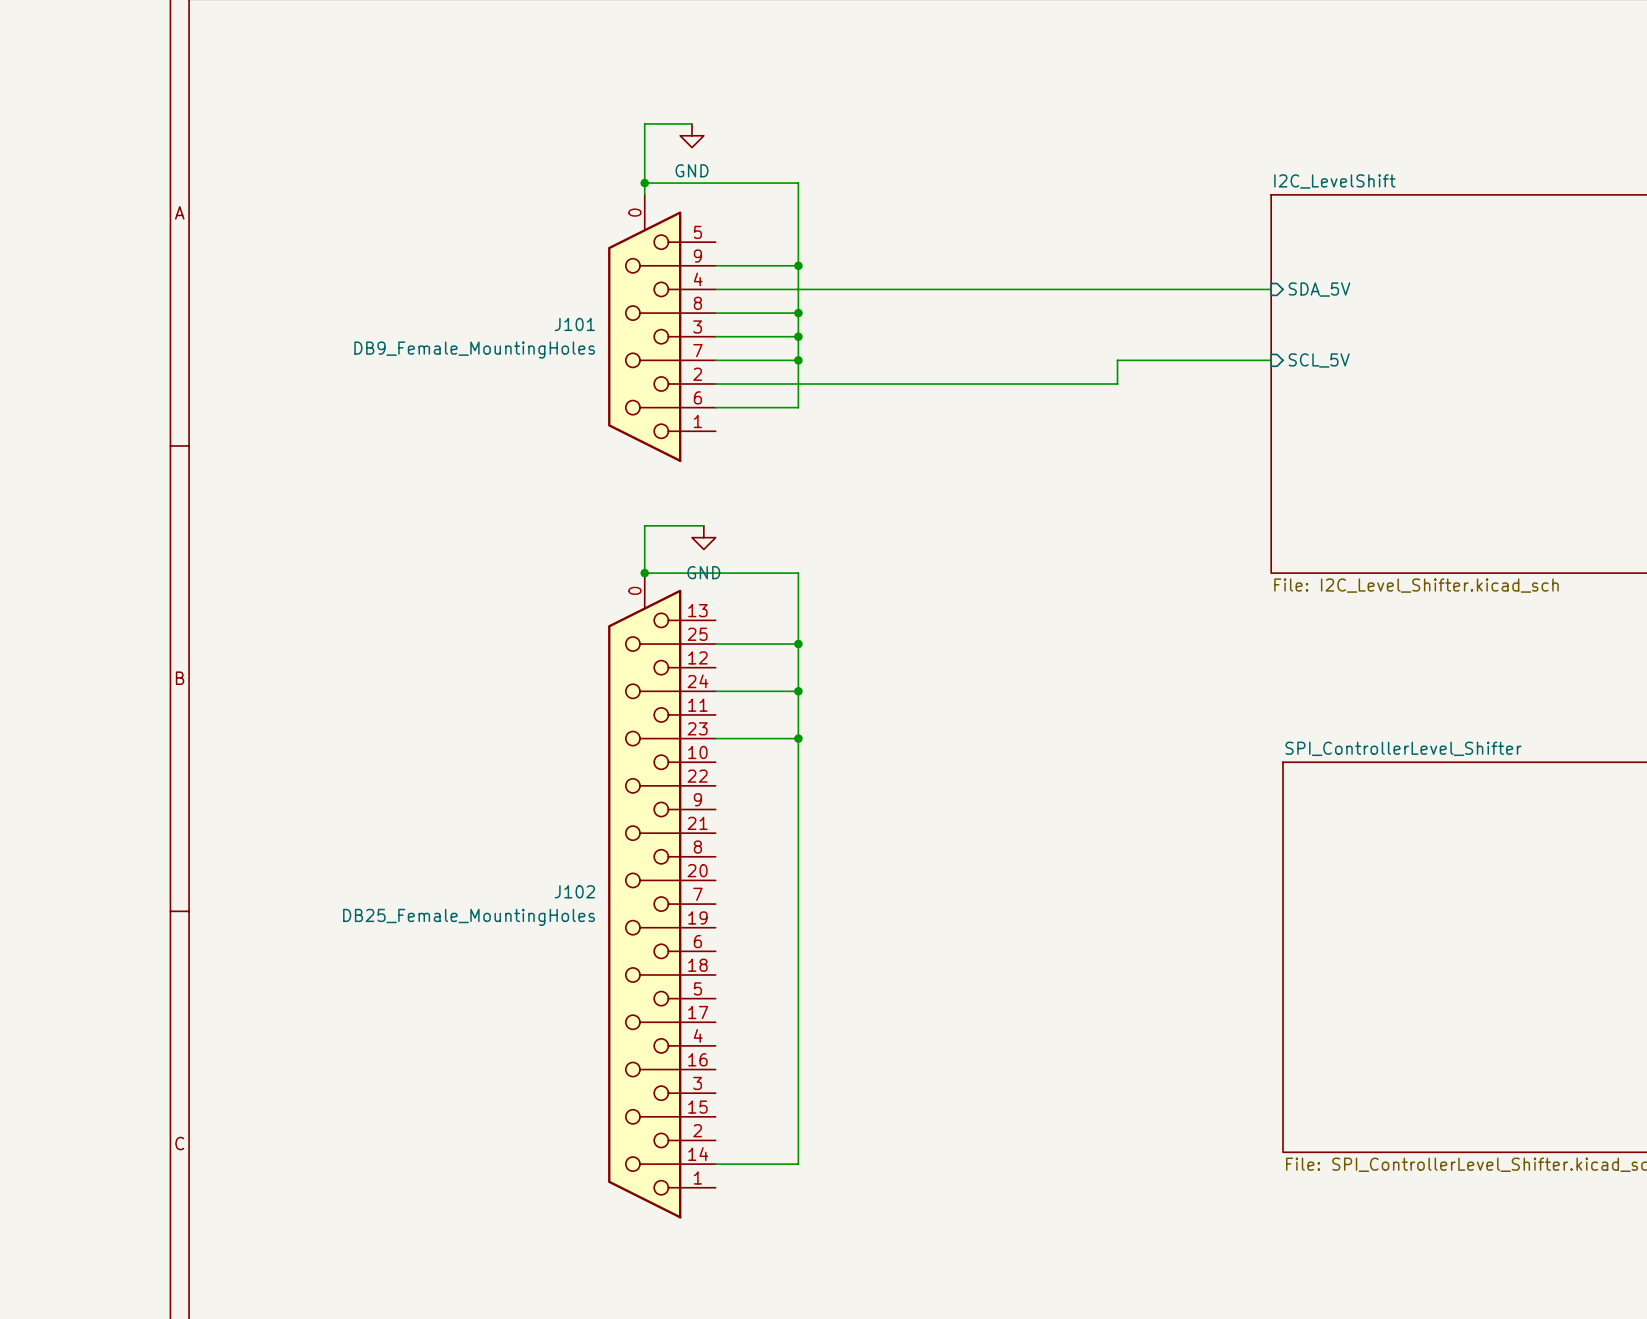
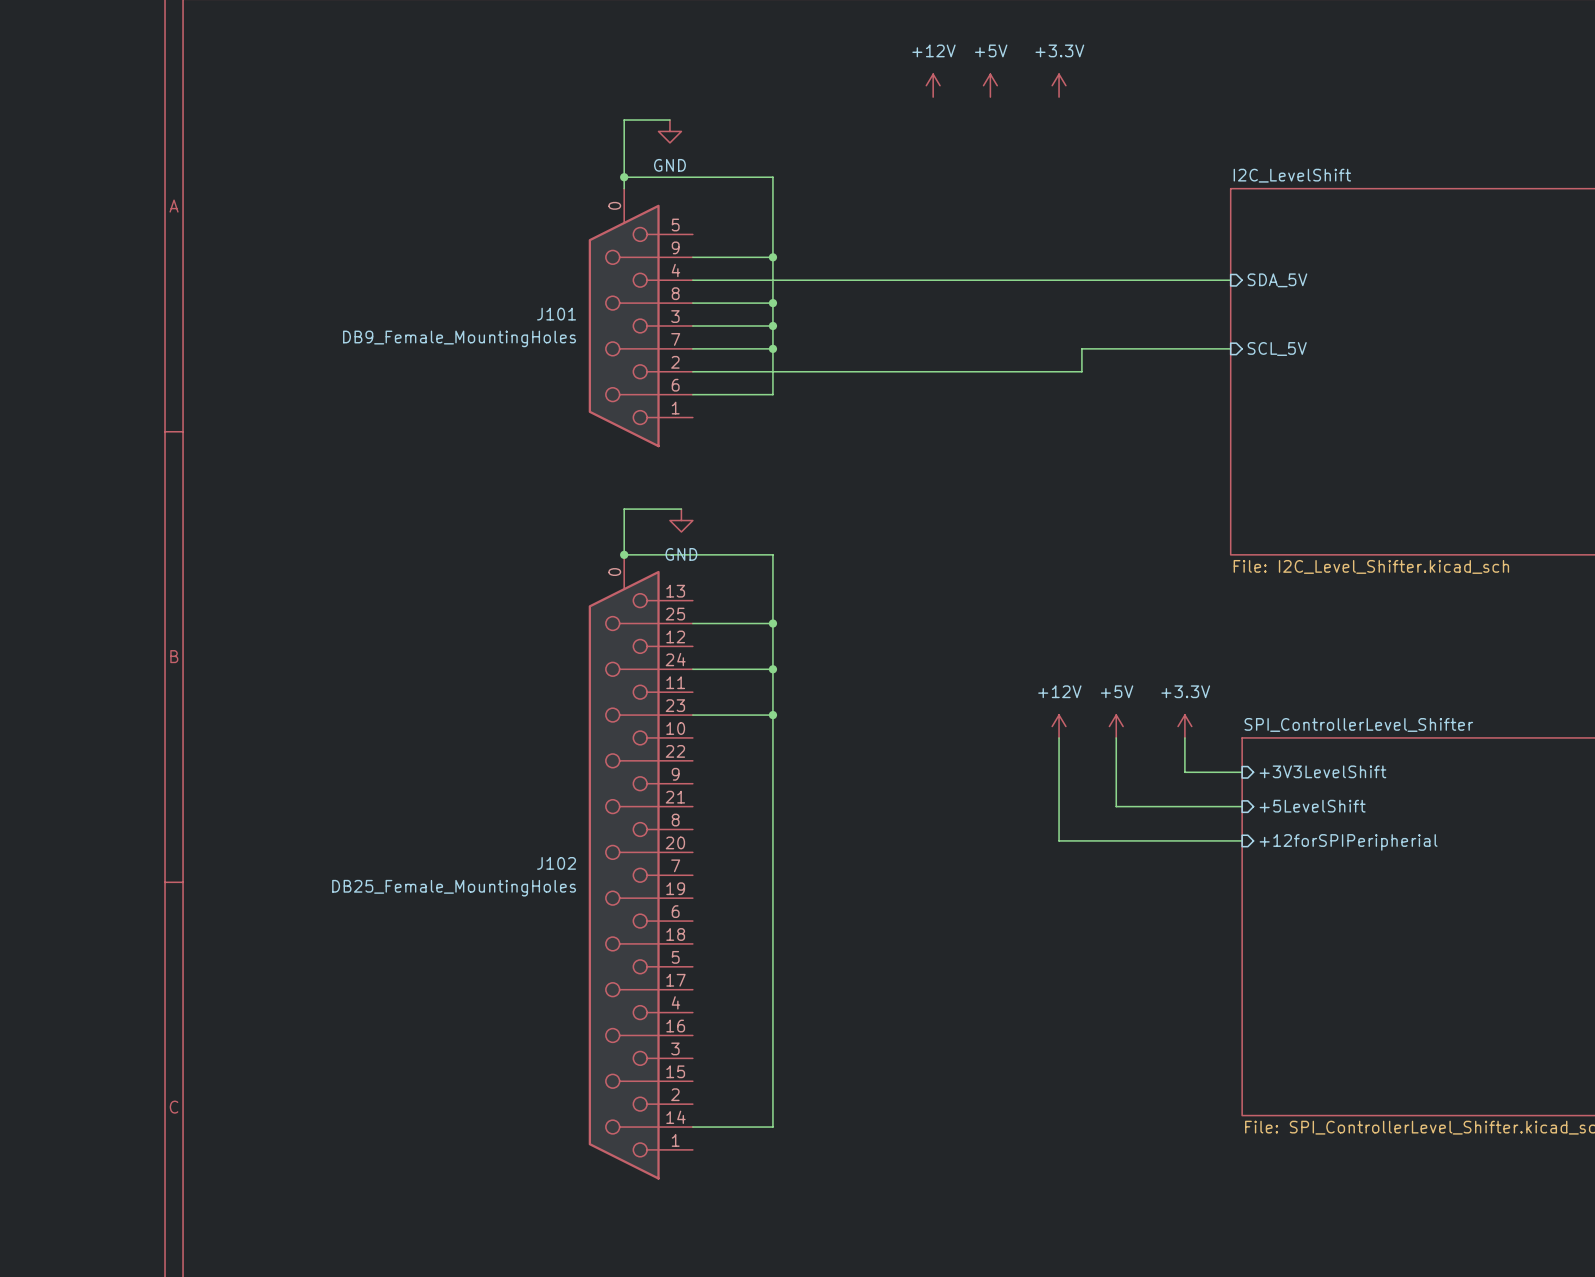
power symbol: none -> +12V (933, 85)
power symbol: none -> +5V (990, 85)
power symbol: none -> +3.3V (1059, 85)
power symbol: none -> +12V (1059, 726)
power symbol: none -> +5V (1116, 726)
power symbol: none -> +3.3V (1184, 726)
wire: none -> (1059, 737) (1059, 840) (1242, 840)
wire: none -> (1116, 737) (1116, 806) (1242, 806)
wire: none -> (1184, 737) (1184, 772) (1242, 772)
sheet pin: none -> +3V3LevelShift (1322, 771)
sheet pin: none -> +5LevelShift (1312, 806)
sheet pin: none -> +12forSPIPeripherial (1348, 842)

